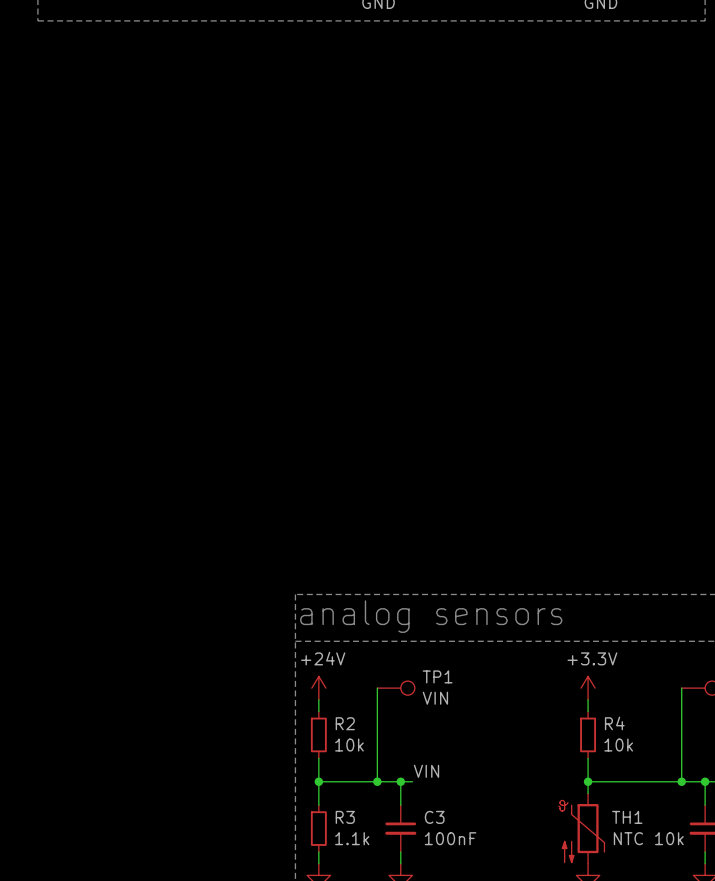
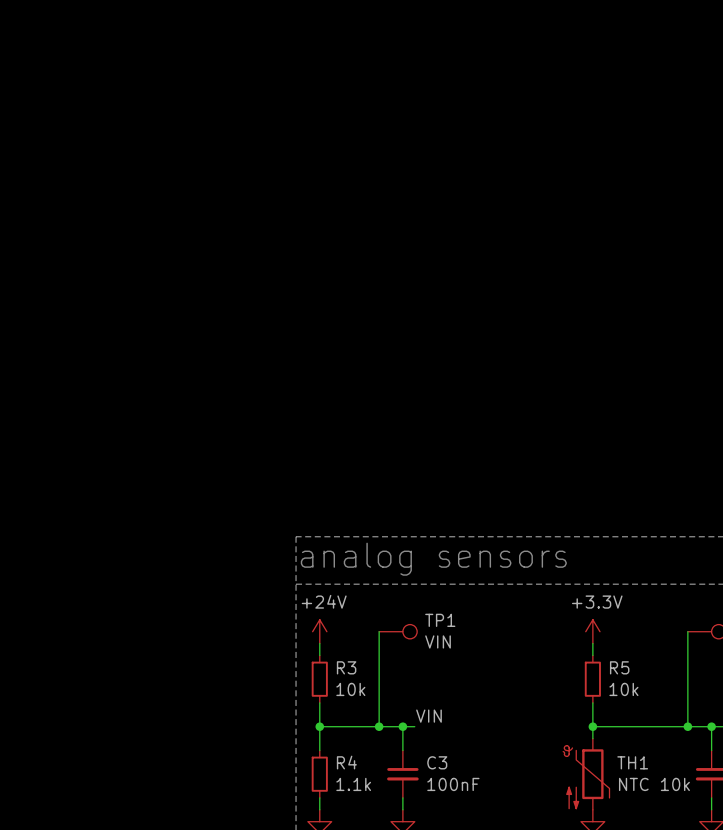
R2 name: R2 (345, 723) -> R3 (346, 667)
R4 name: R4 (614, 723) -> R5 (619, 667)
R3 name: R3 (345, 817) -> R4 (346, 762)

